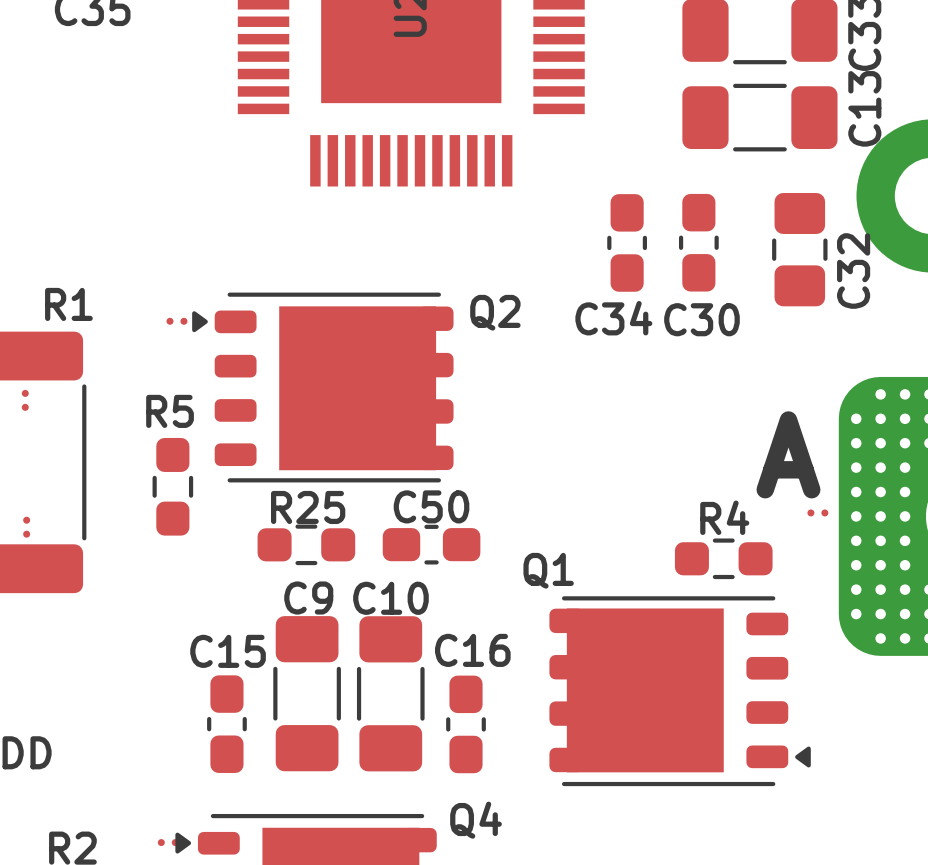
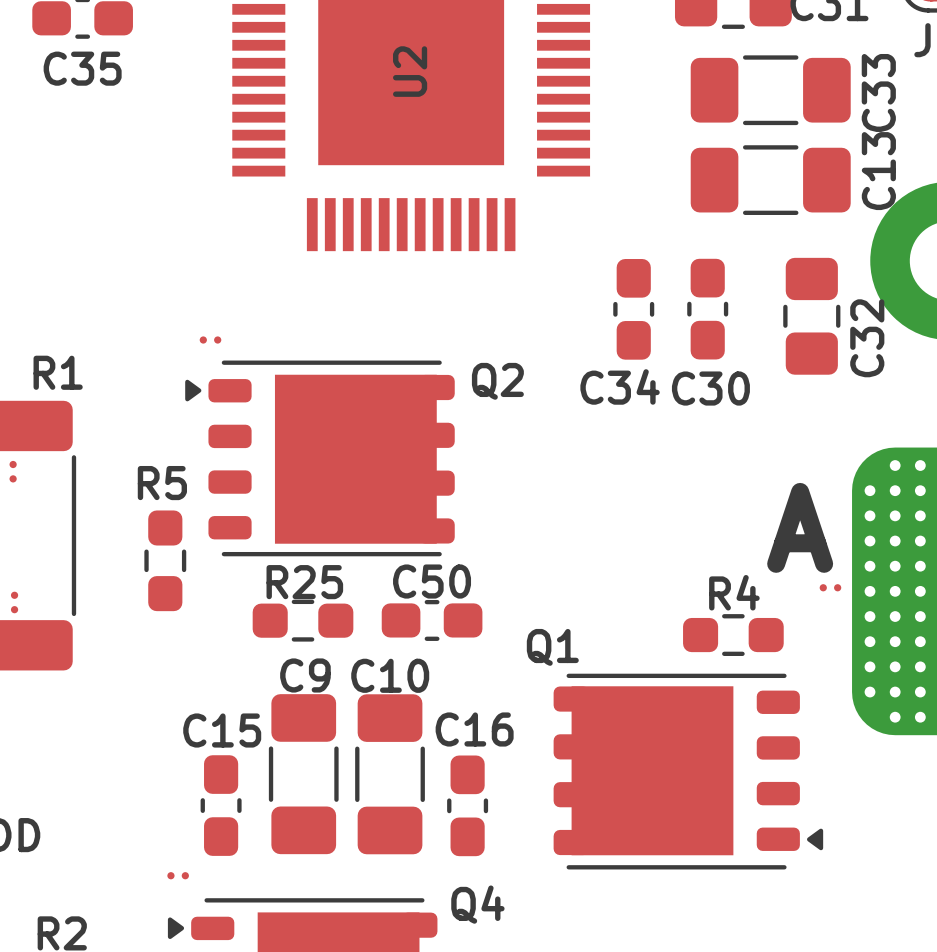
part position: (176, 321) -> (210, 340)
part position: (168, 842) -> (178, 875)

